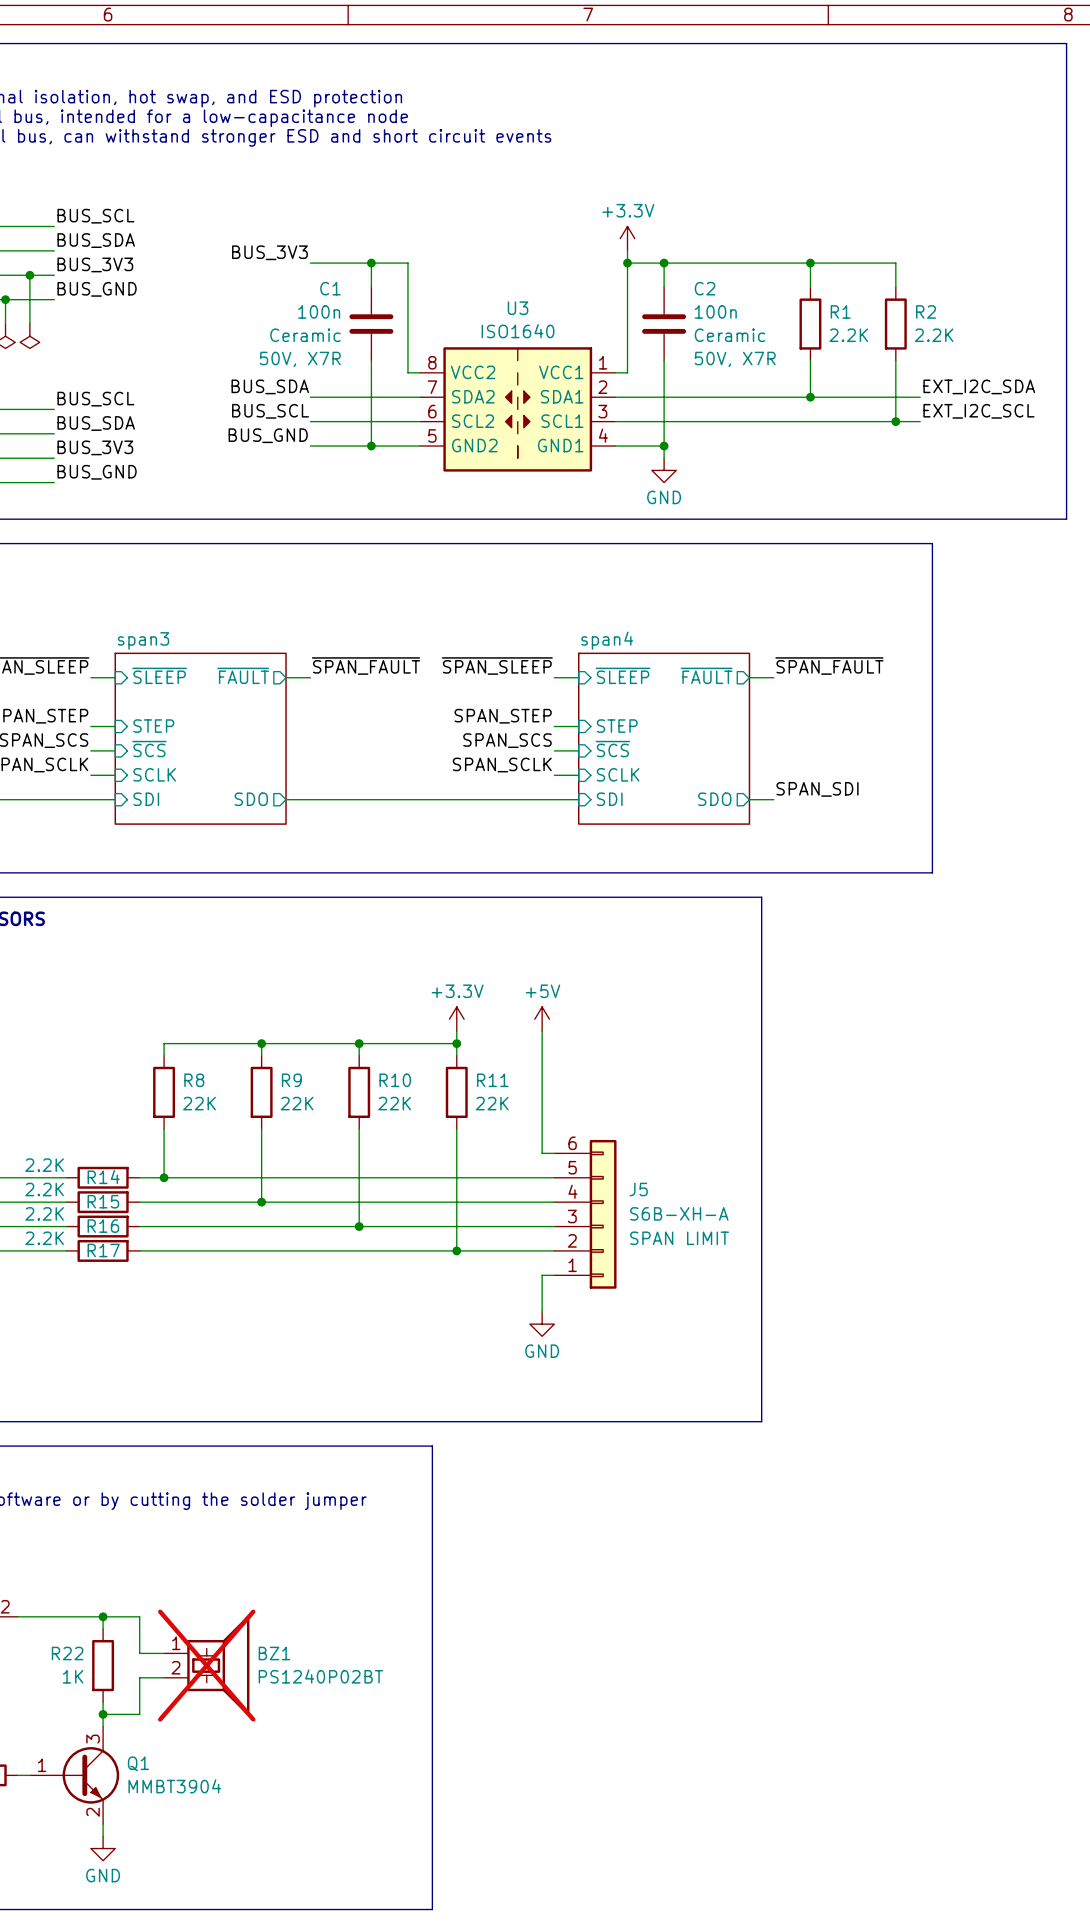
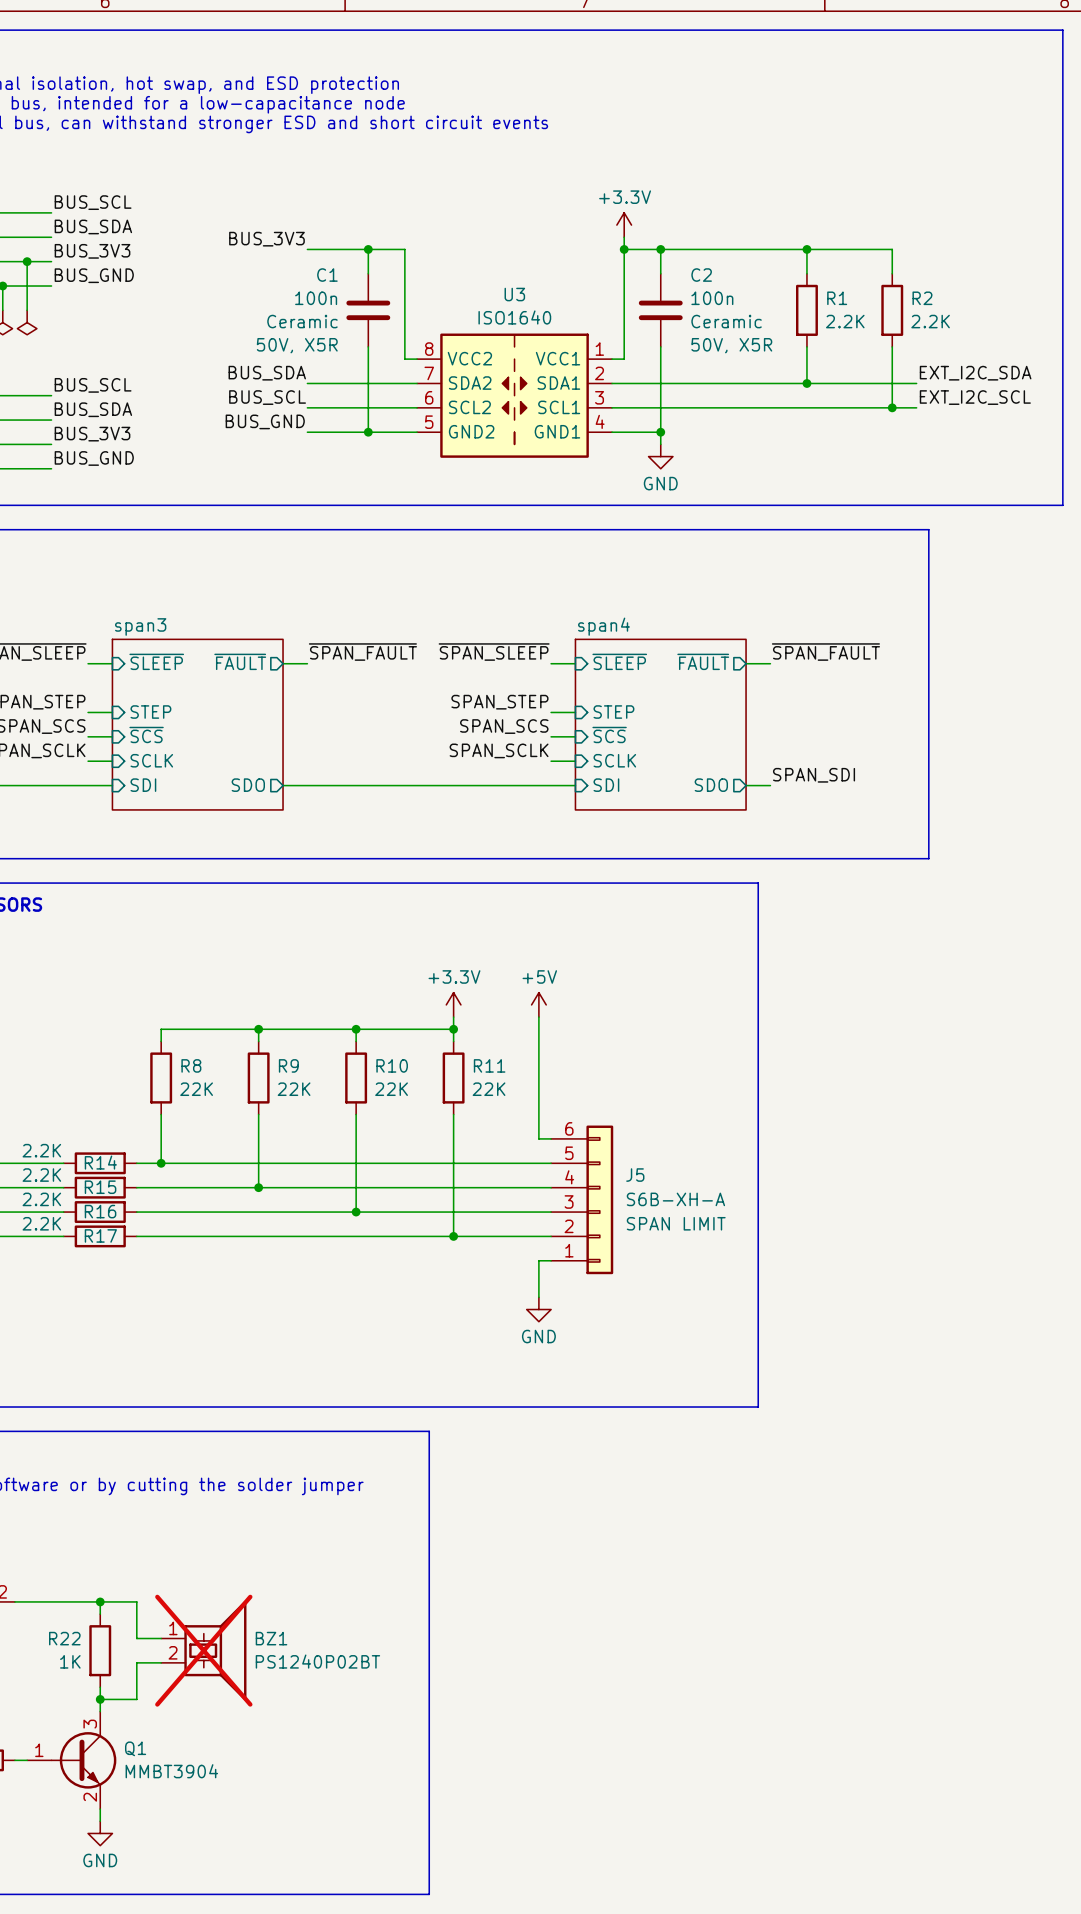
C1 text: 50V, X7R (300, 359) -> 50V, X5R (297, 345)
C2 text: 50V, X7R (735, 359) -> 50V, X5R (731, 345)

